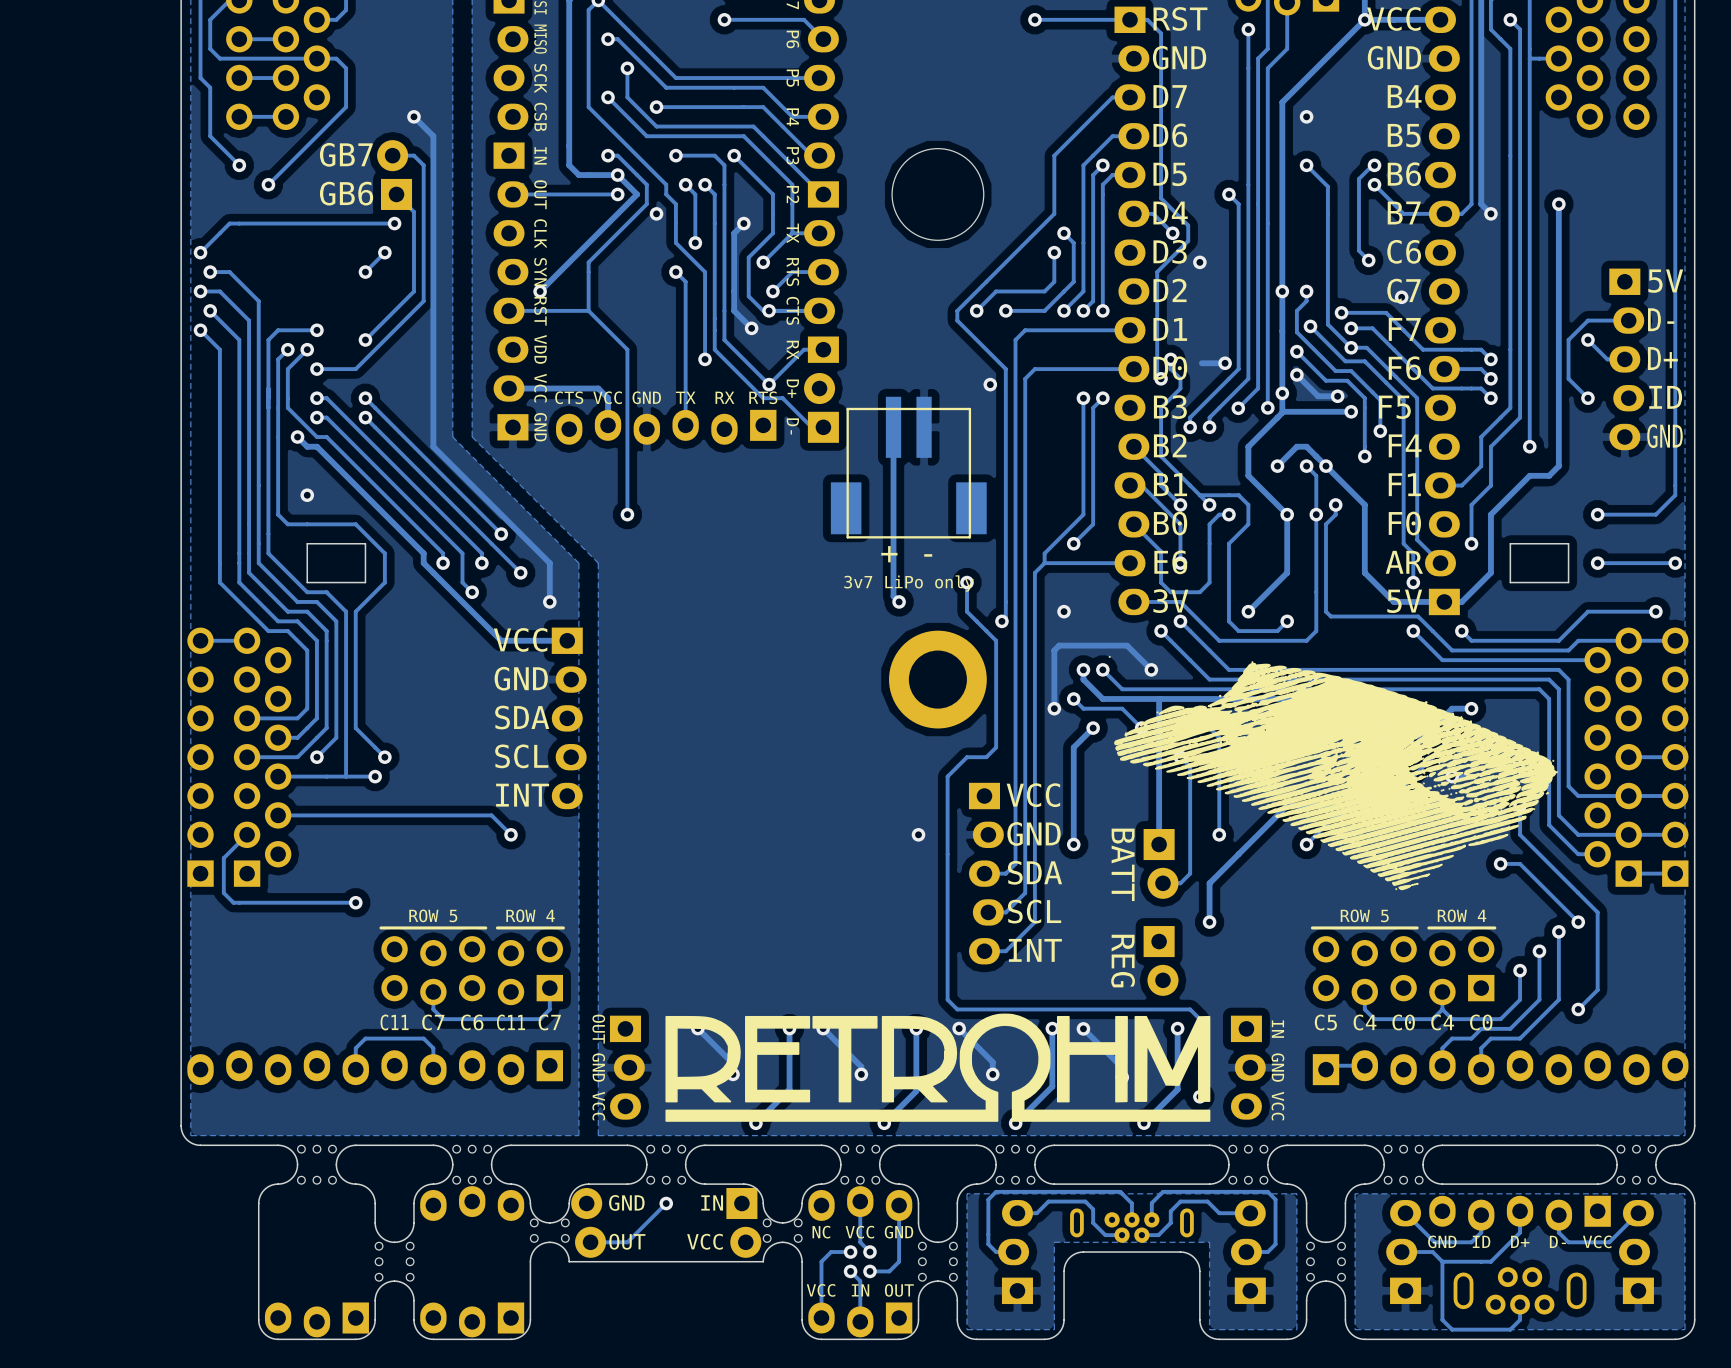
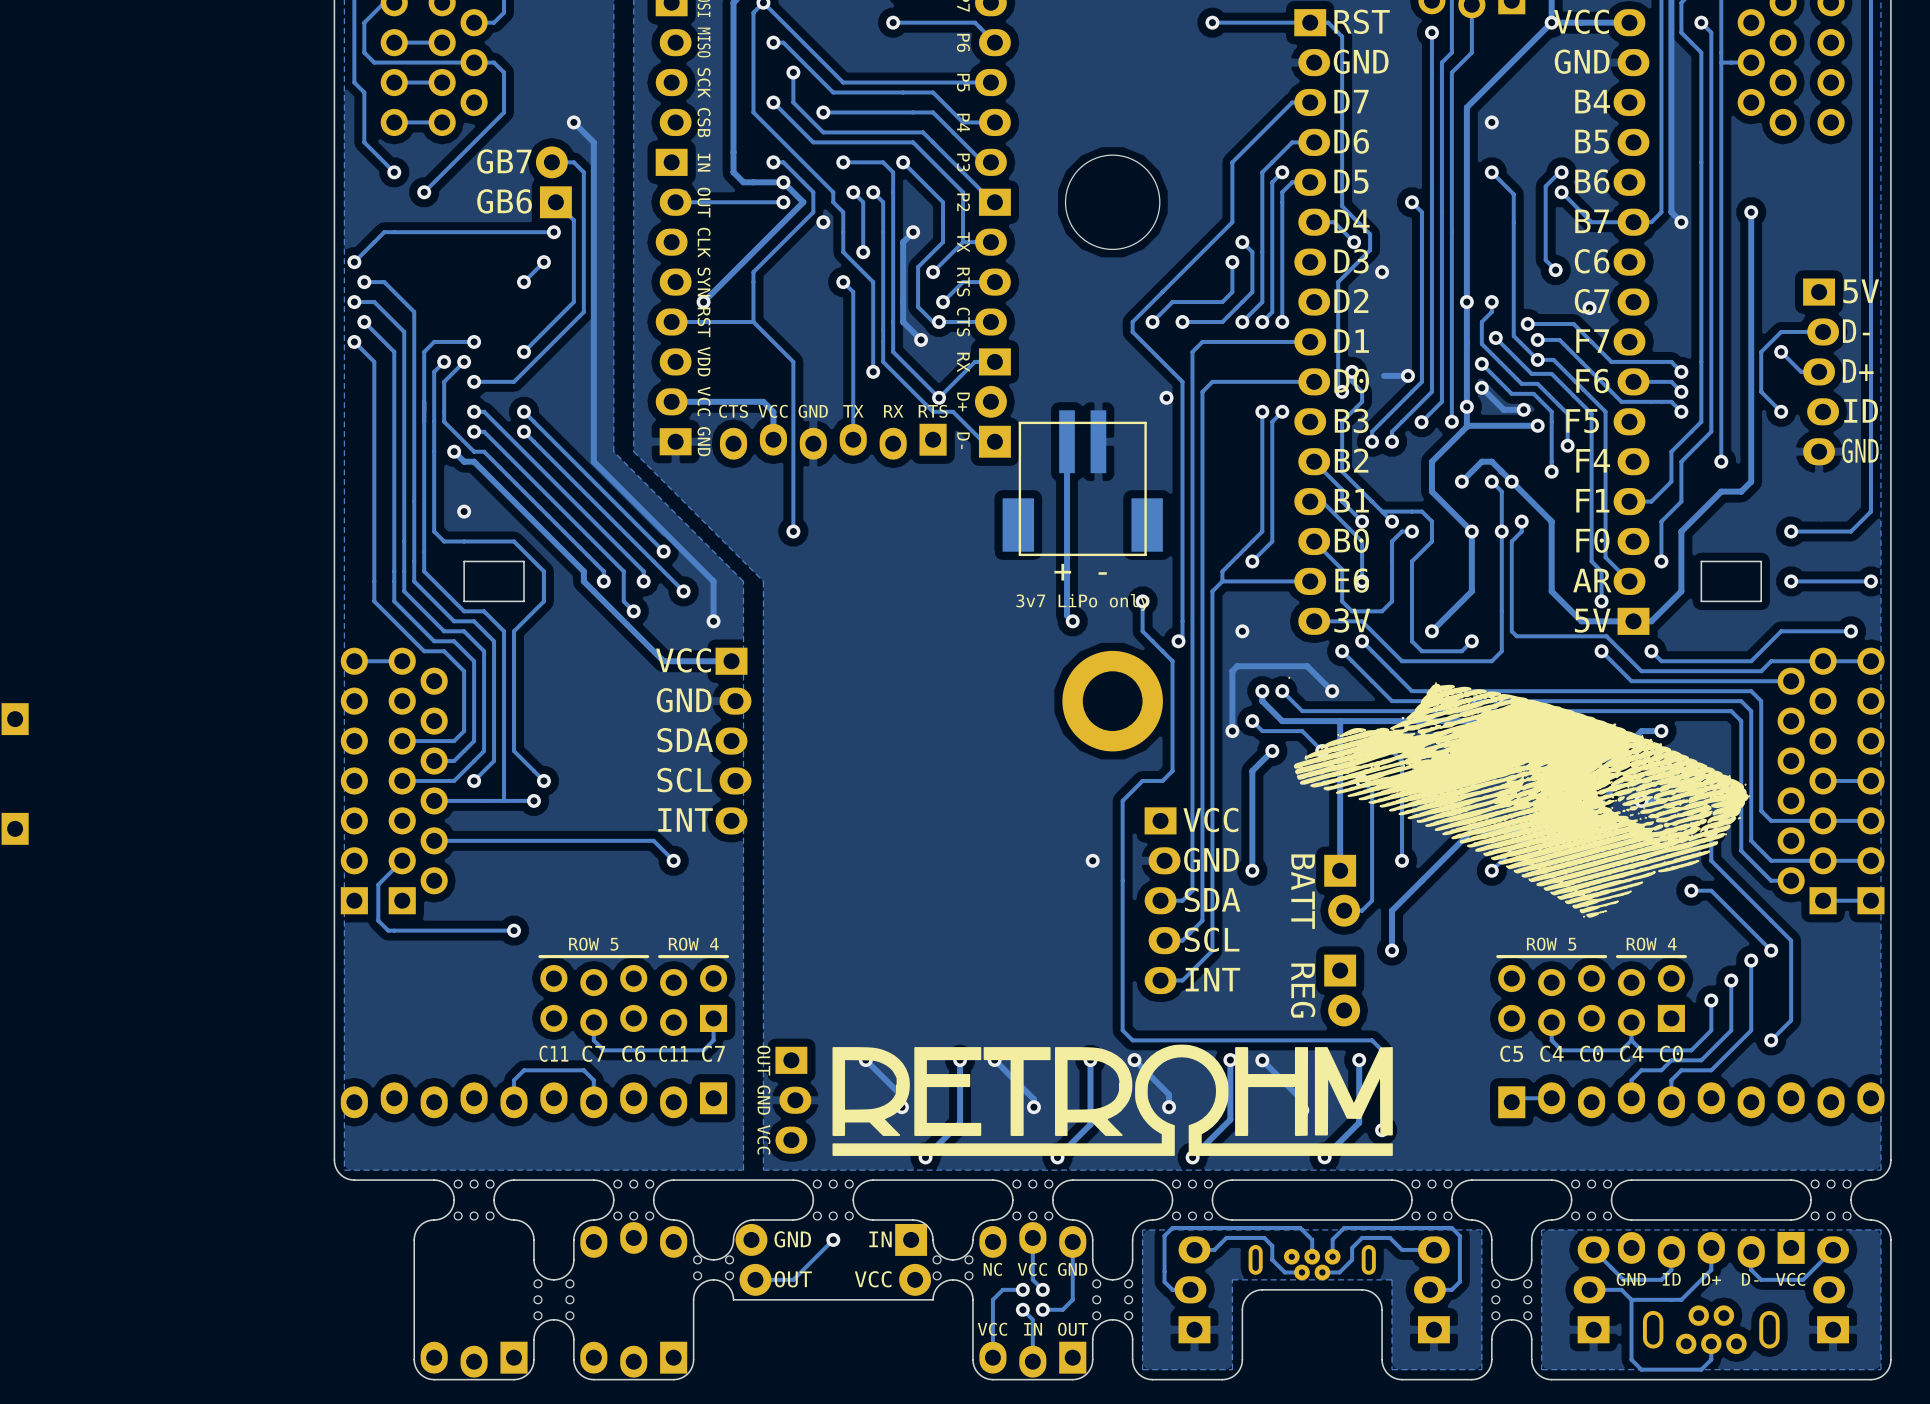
text: IN (1277, 1029) -> none
part: (1248, 1067) -> none
text: GND (1277, 1067) -> none
text: VCC (1277, 1106) -> none

